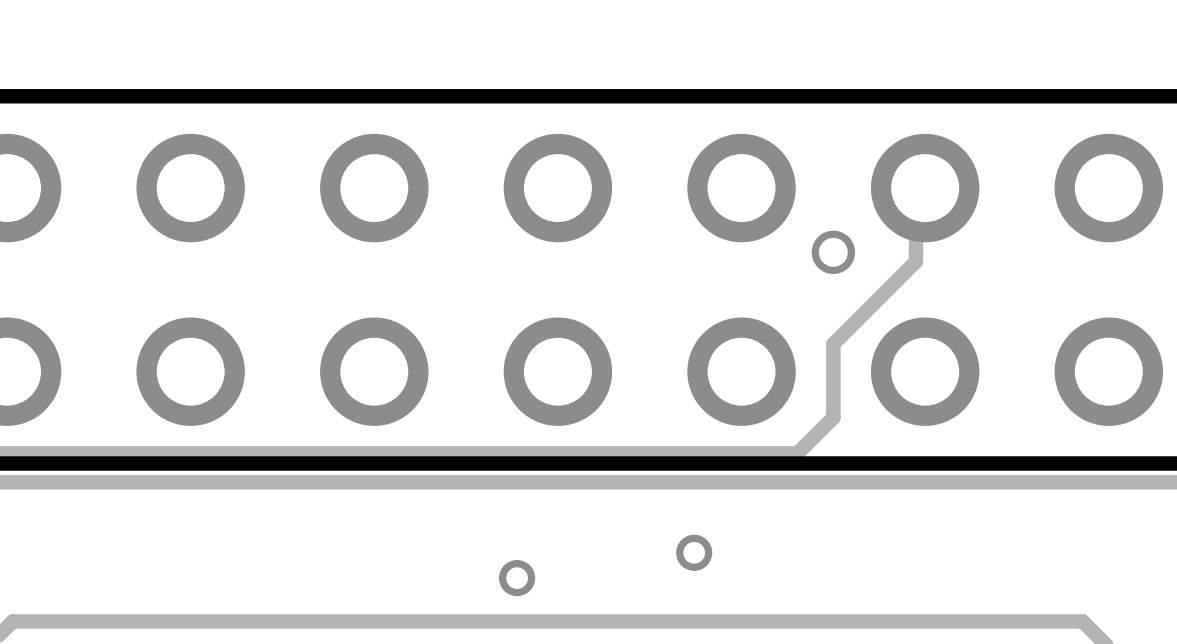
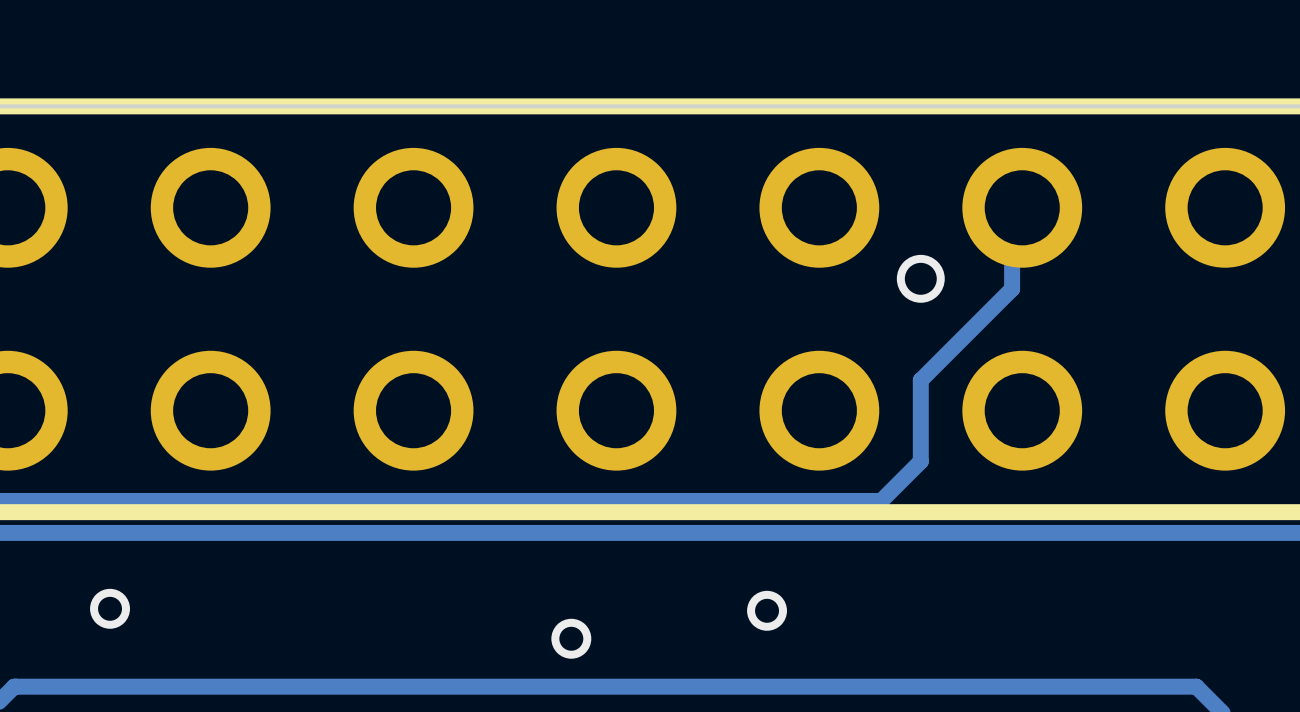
via: none -> (110, 608)

